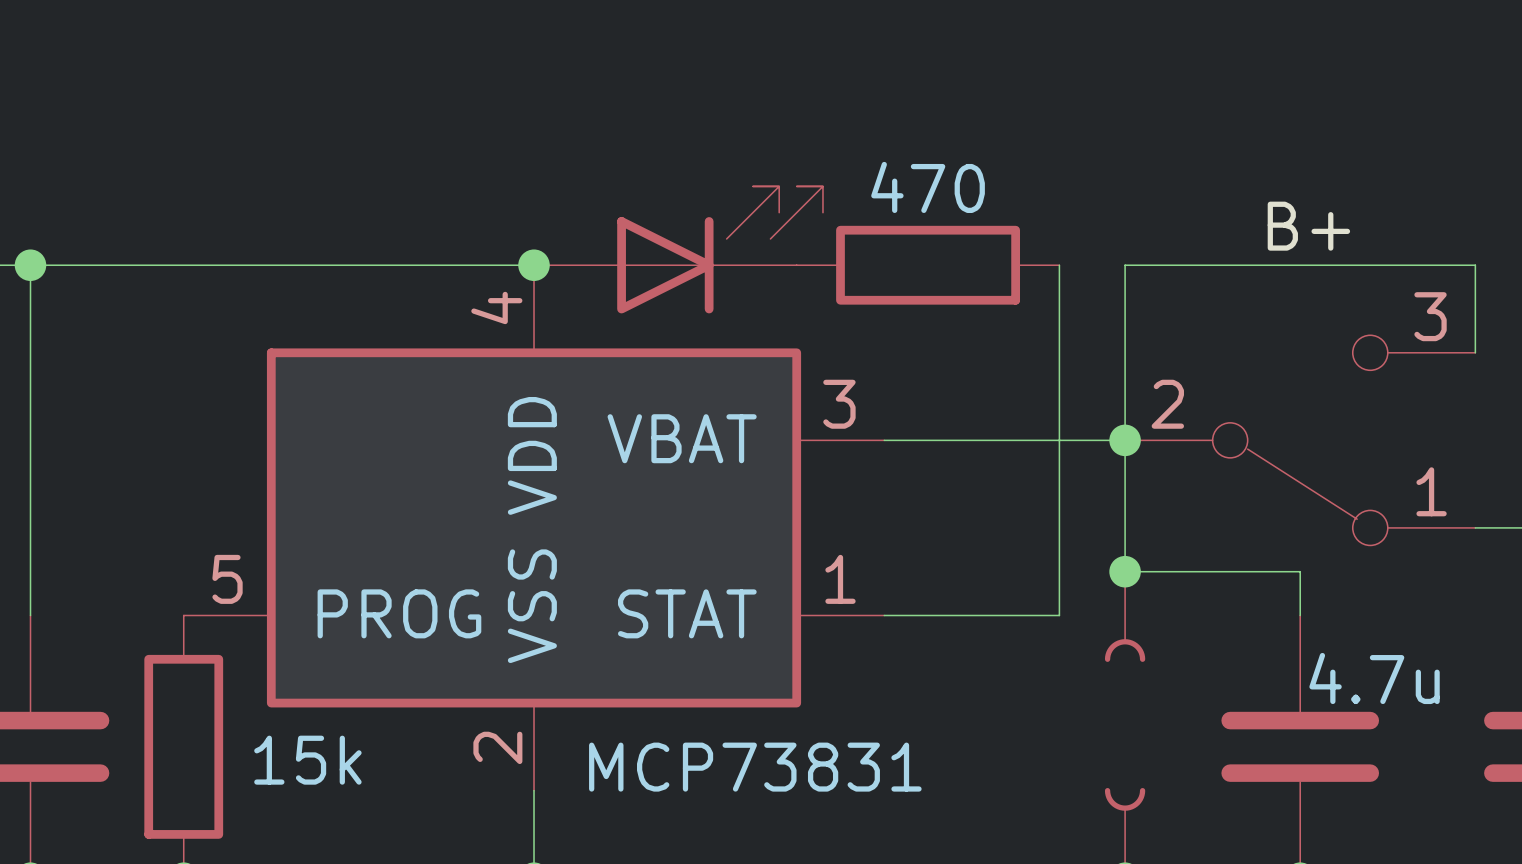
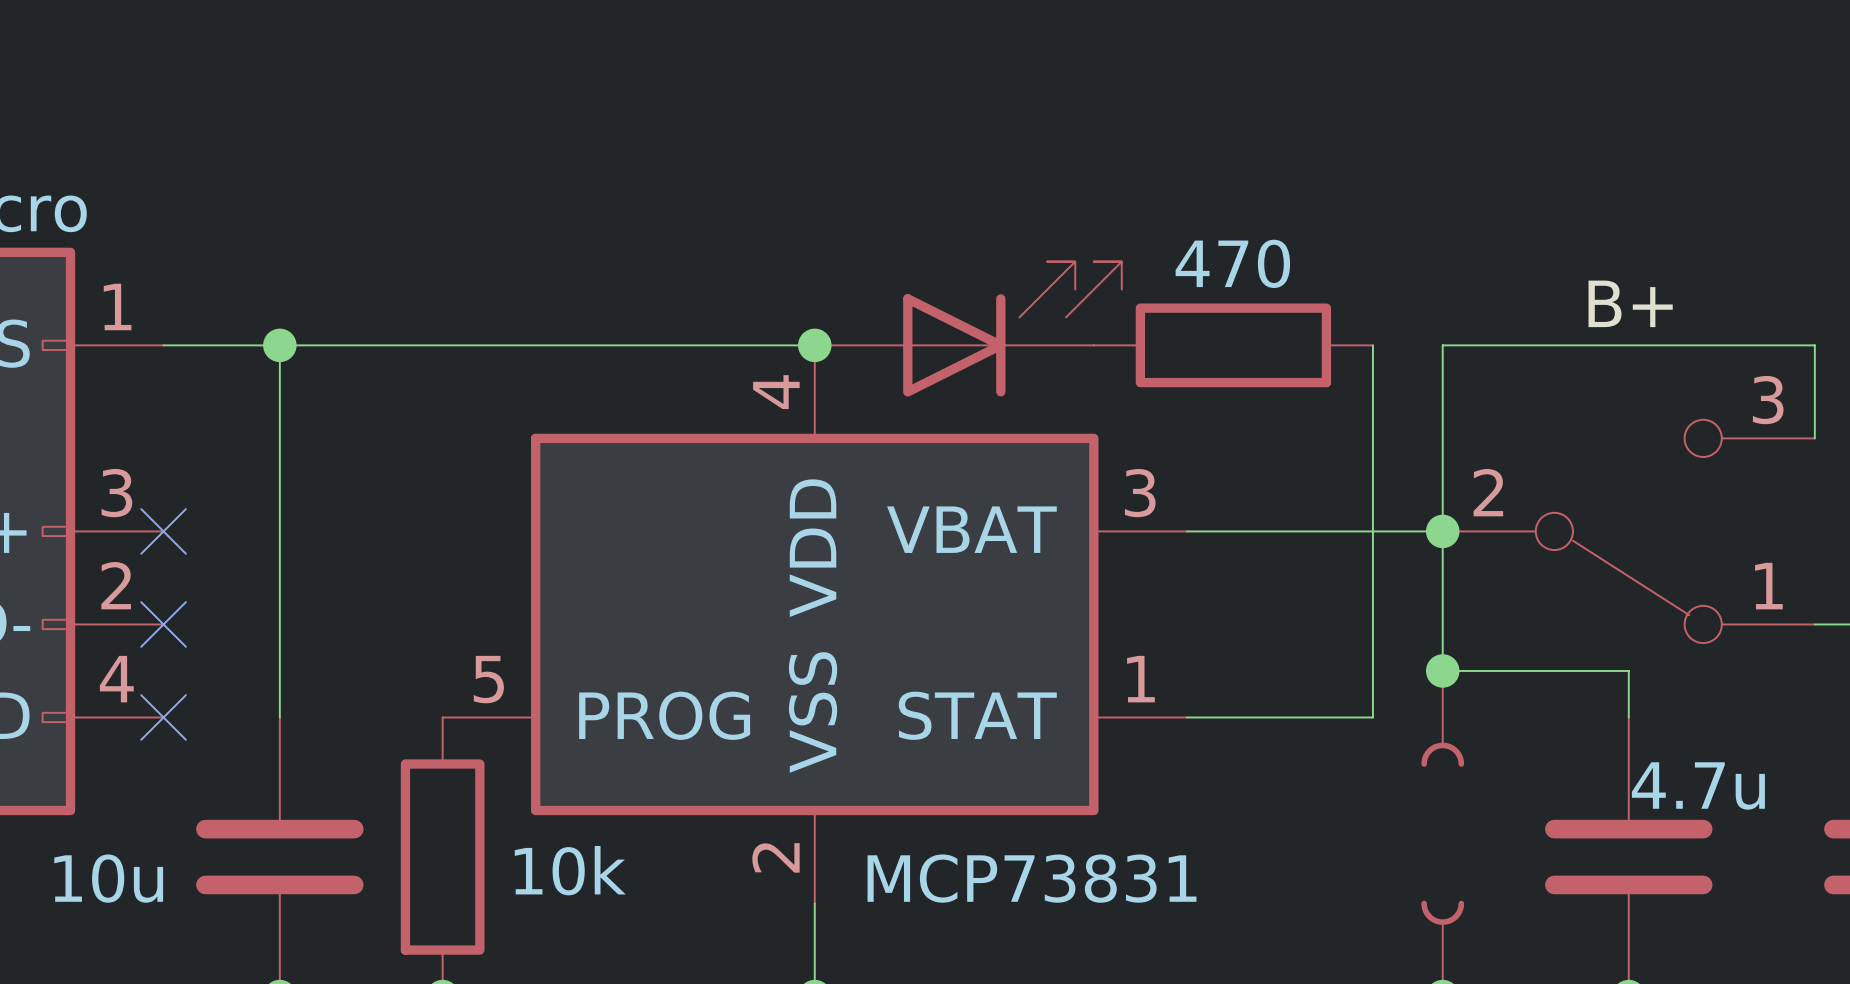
part value: 15k (307, 760) -> 10k (570, 870)

